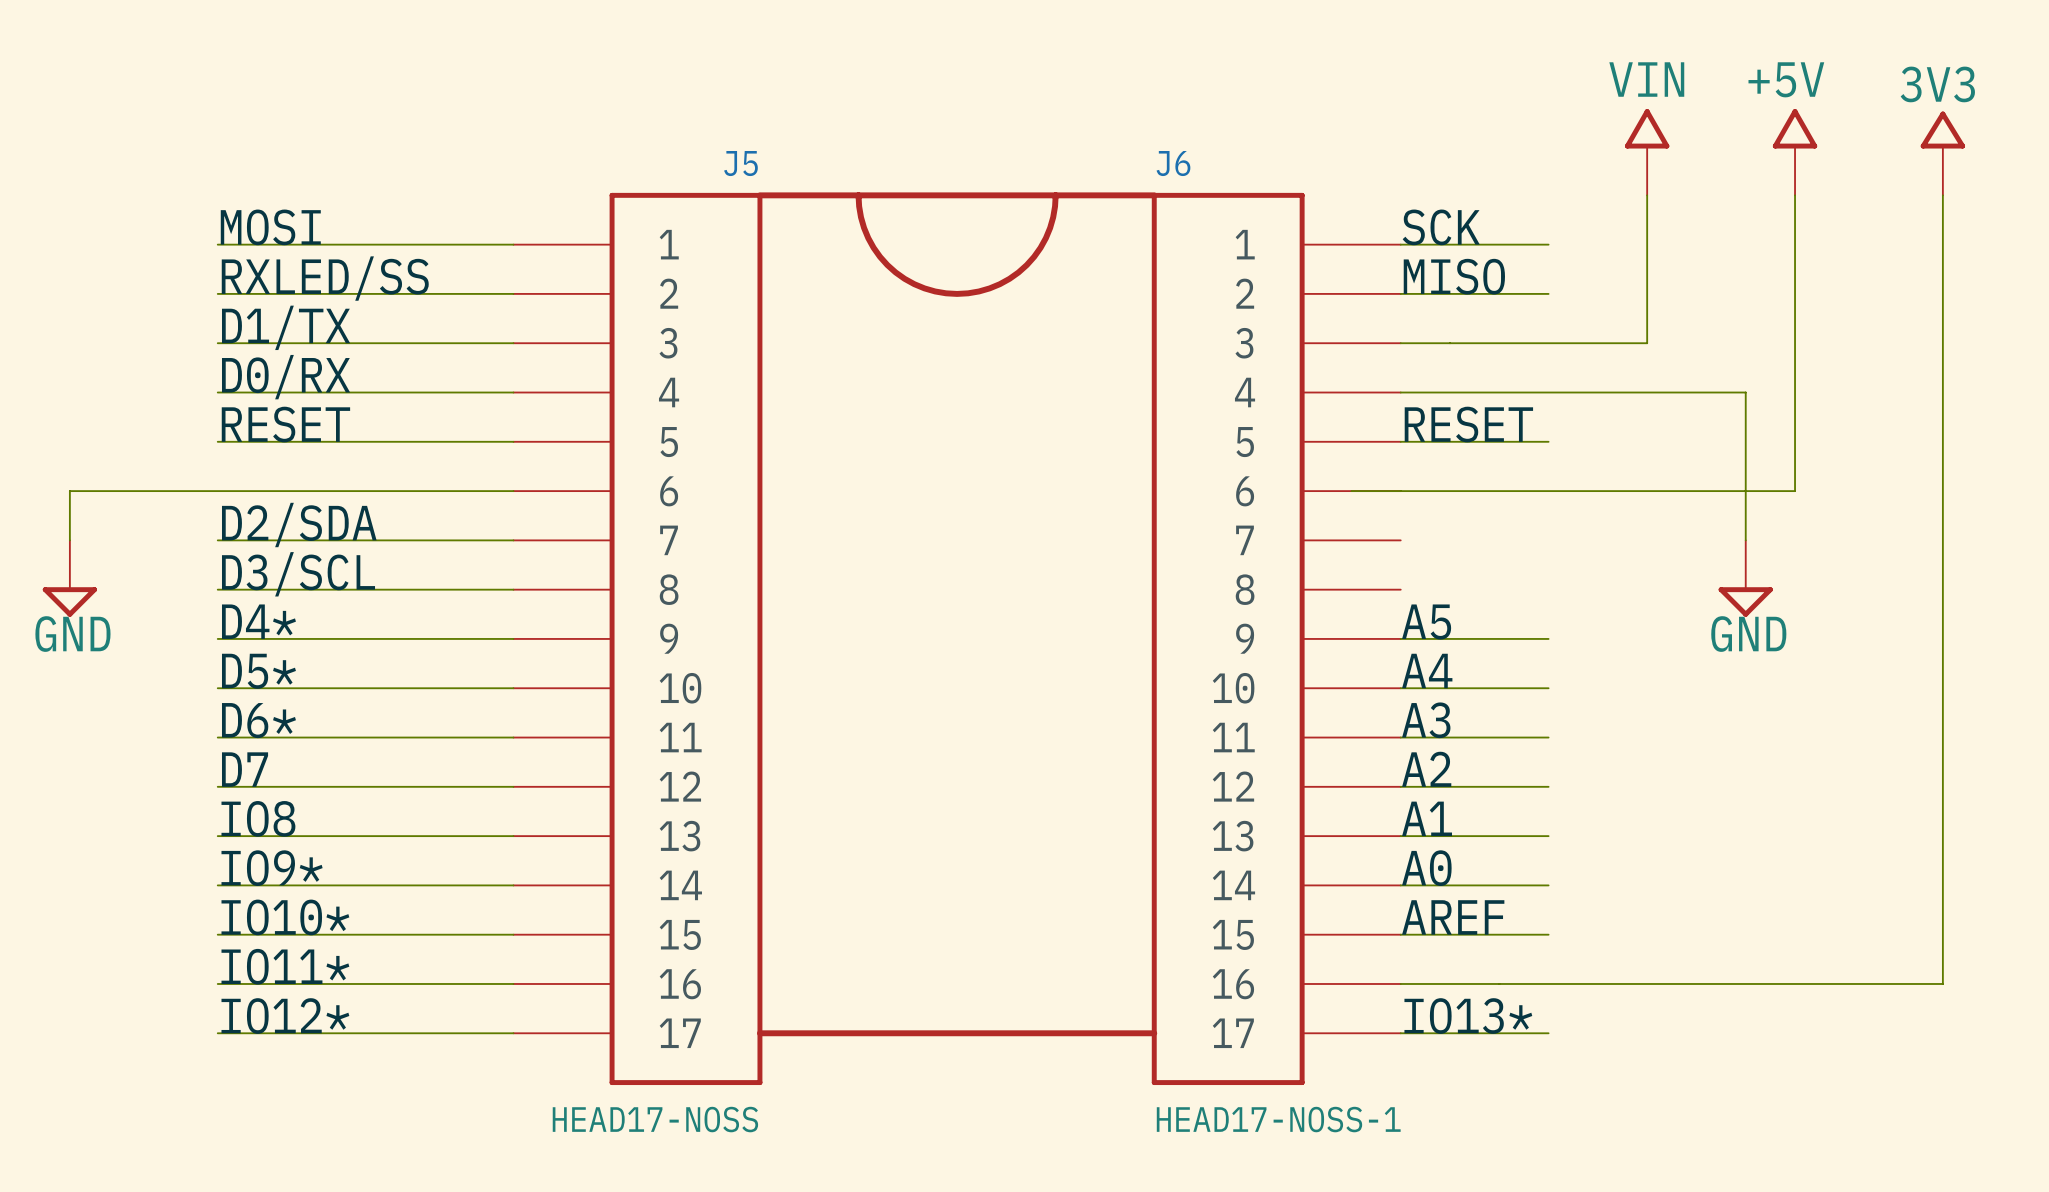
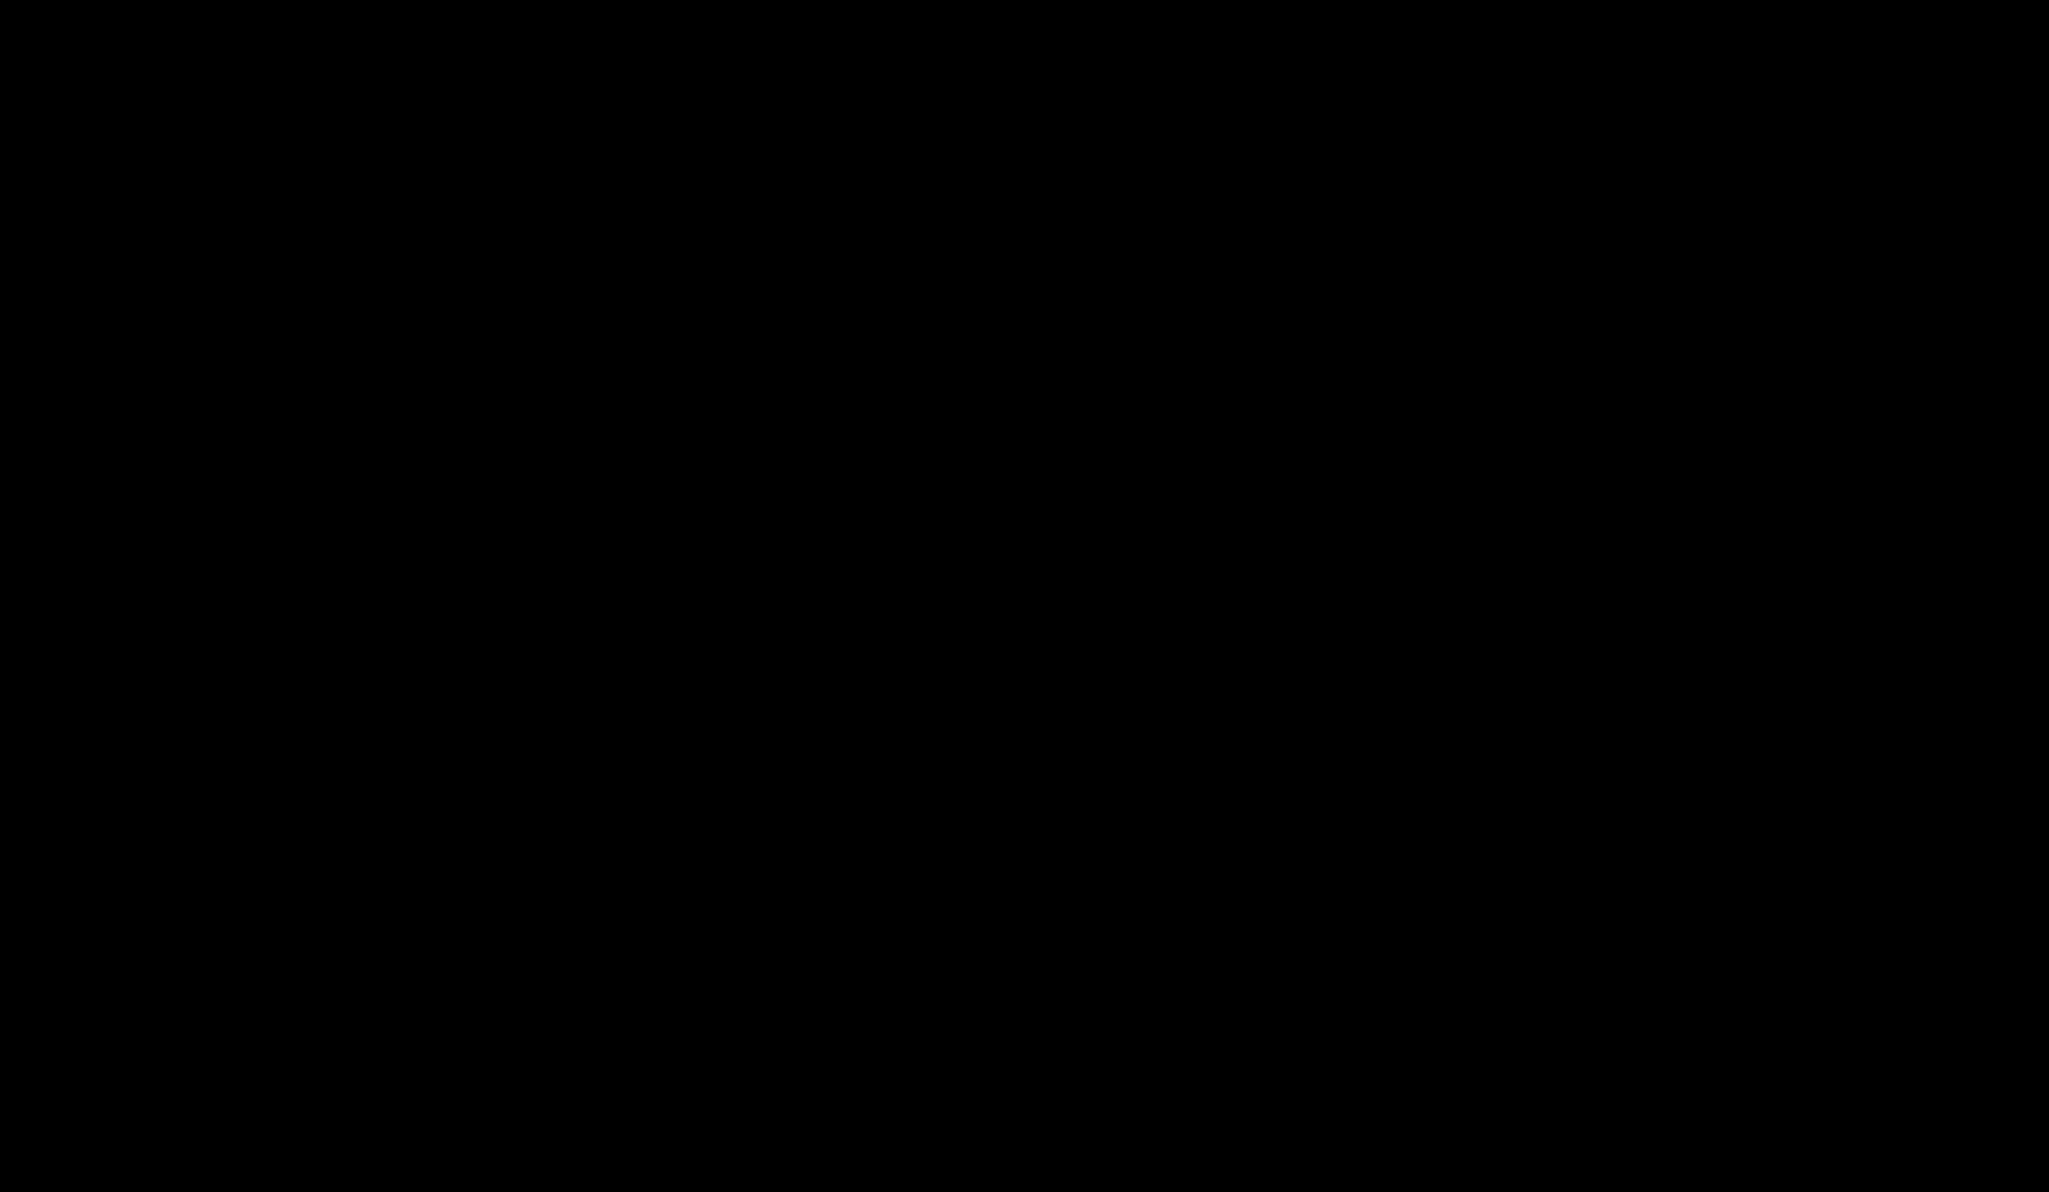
power symbol: VIN (1647, 152) -> none
power symbol: +5V (1795, 152) -> none
power symbol: 3V3 (1942, 153) -> none
line: (759, 195) (1154, 195) -> none
line: (858, 195) (860, 217) (868, 238) (887, 265) (914, 284) (935, 291) (957, 293) (979, 291) (999, 284) (1026, 265) (1045, 238) (1053, 217) (1055, 195) -> none
wire: (1647, 195) (1647, 343) (1400, 343) -> none
wire: (1795, 195) (1795, 491) (1351, 491) -> none
wire: (1942, 195) (1942, 983) (1400, 983) -> none
label: MOSI (270, 227) -> none
label: SCK (1441, 227) -> none
wire: (217, 244) (513, 244) -> none
wire: (1400, 244) (1548, 244) -> none
label: MISO (1454, 276) -> none
label: RXLED/SS (325, 278) -> none
wire: (217, 293) (513, 293) -> none
wire: (1400, 293) (1548, 293) -> none
label: D1/TX (286, 327) -> none
wire: (217, 343) (513, 343) -> none
label: D0/RX (286, 377) -> none
wire: (217, 392) (513, 392) -> none
wire: (1400, 392) (1745, 392) (1745, 540) -> none
label: RESET (285, 424) -> none
label: RESET (1468, 424) -> none
wire: (217, 441) (513, 441) -> none
wire: (1400, 441) (1548, 441) -> none
wire: (513, 491) (69, 491) (69, 540) -> none
label: D2/SDA (299, 525) -> none
wire: (217, 540) (513, 540) -> none
label: D3/SCL (298, 574) -> none
power symbol: GND (69, 578) -> none
power symbol: GND (1745, 578) -> none
wire: (217, 589) (513, 589) -> none
label: D4* (258, 621) -> none
label: A5 (1426, 622) -> none
wire: (217, 638) (513, 638) -> none
J5: HEAD17-NOSS (637, 638) -> none
J6: HEAD17-NOSS-1 (1276, 638) -> none
wire: (1400, 638) (1548, 638) -> none
label: D5* (258, 671) -> none
label: A4 (1427, 671) -> none
wire: (217, 688) (513, 688) -> none
wire: (1400, 688) (1548, 688) -> none
label: D6* (258, 720) -> none
label: A3 (1426, 720) -> none
wire: (217, 737) (513, 737) -> none
wire: (1400, 737) (1548, 737) -> none
label: D7 (245, 769) -> none
label: A2 (1426, 769) -> none
wire: (217, 786) (513, 786) -> none
wire: (1400, 786) (1548, 786) -> none
label: IO8 (258, 818) -> none
label: A1 (1427, 818) -> none
wire: (217, 836) (513, 836) -> none
wire: (1400, 836) (1548, 836) -> none
label: IO9* (272, 868) -> none
label: A0 (1426, 868) -> none
wire: (217, 885) (513, 885) -> none
wire: (1400, 885) (1548, 885) -> none
label: IO10* (285, 917) -> none
label: AREF (1453, 917) -> none
wire: (217, 934) (513, 934) -> none
wire: (1400, 934) (1548, 934) -> none
label: IO11* (285, 966) -> none
wire: (217, 983) (513, 983) -> none
label: IO12* (285, 1016) -> none
label: IO13* (1468, 1016) -> none
wire: (217, 1033) (513, 1033) -> none
line: (759, 1033) (1154, 1033) -> none
wire: (1400, 1033) (1548, 1033) -> none

